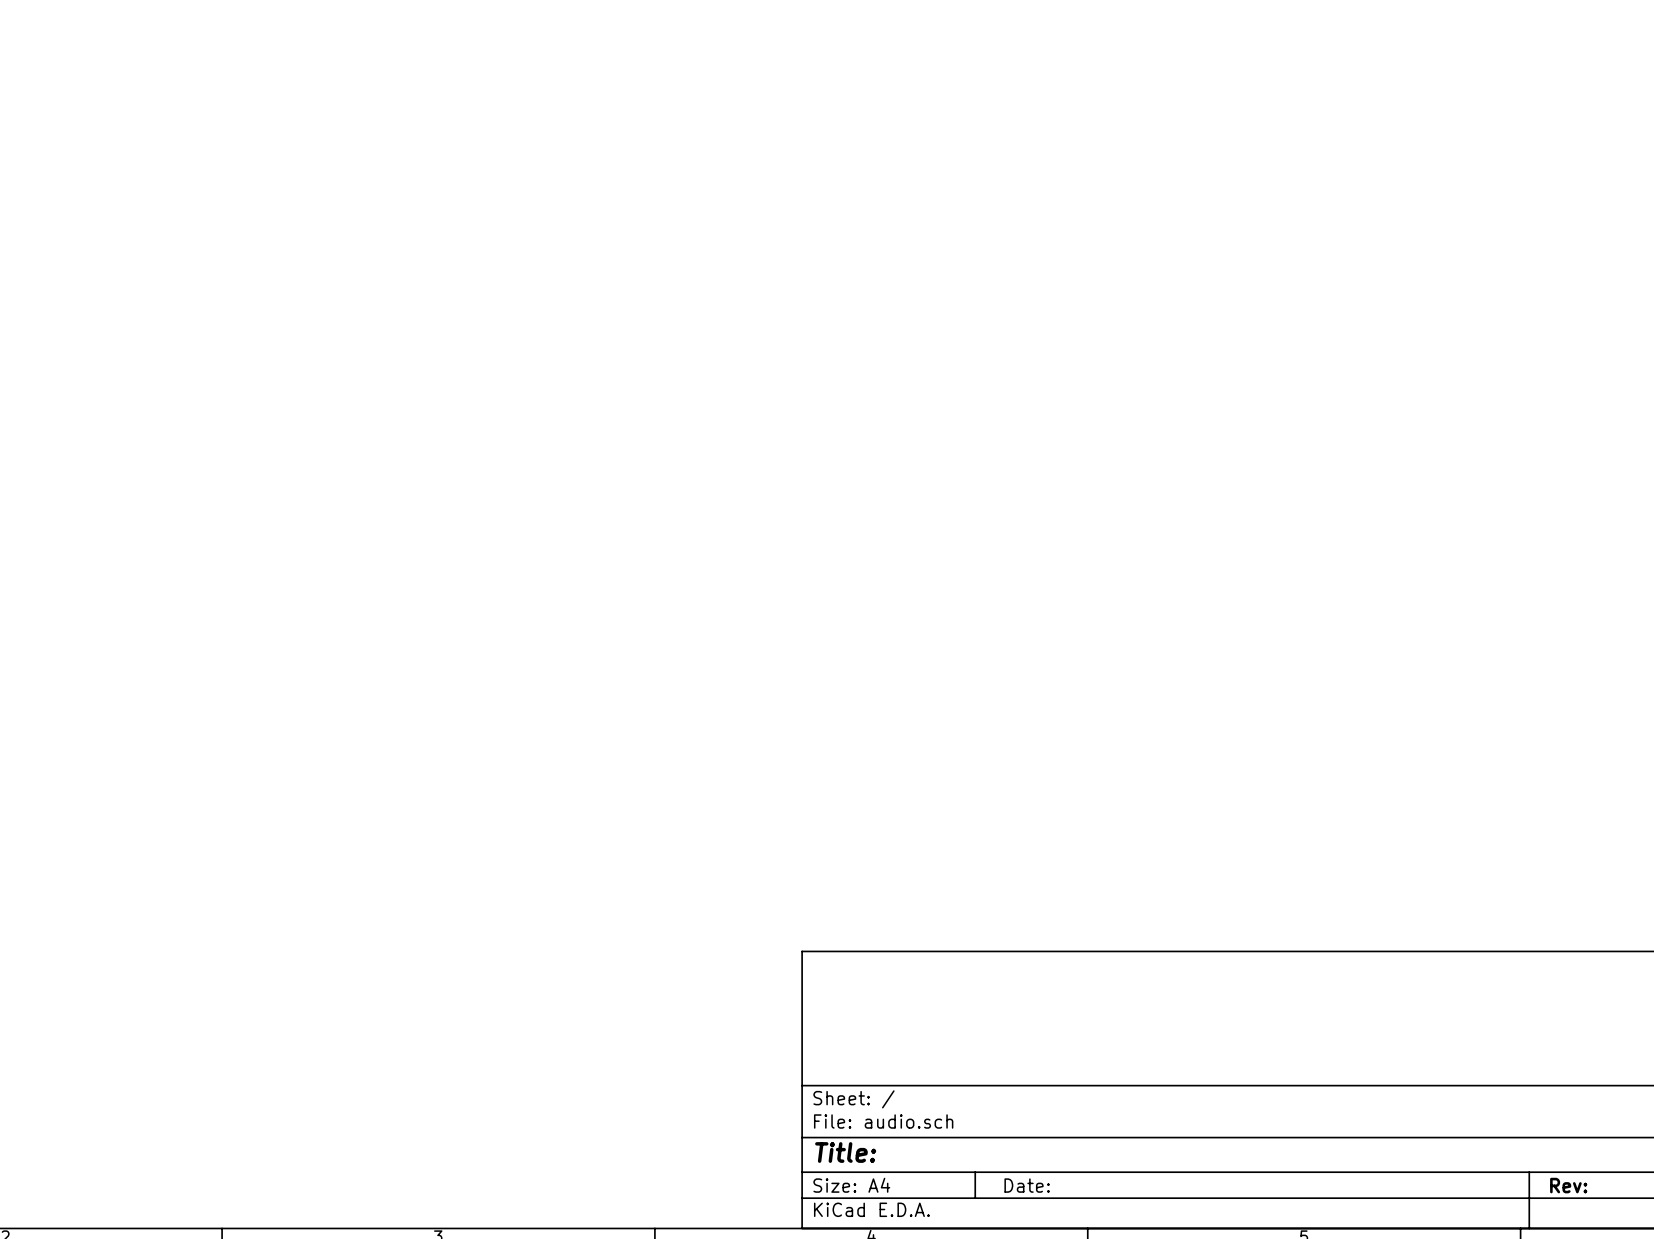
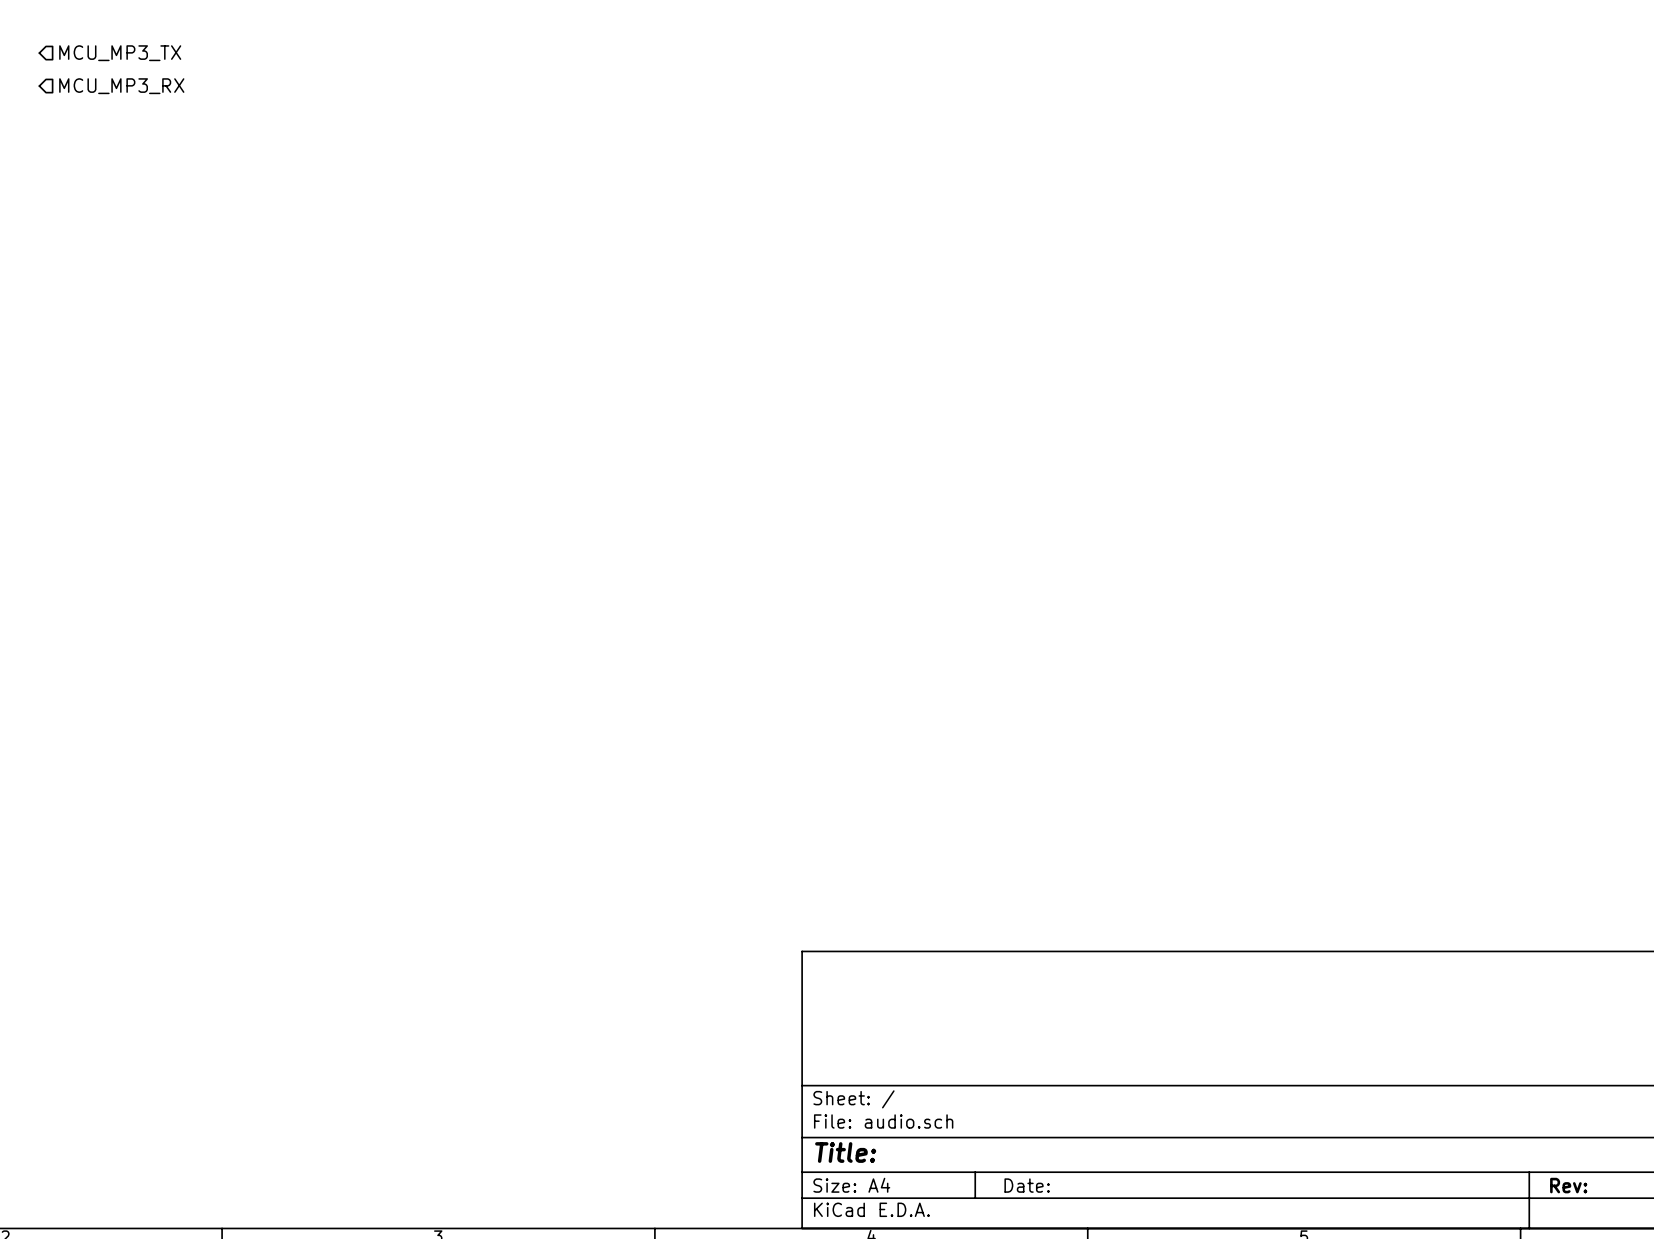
hierarchical label: none -> MCU_MP3_TX (120, 53)
hierarchical label: none -> MCU_MP3_RX (121, 86)

